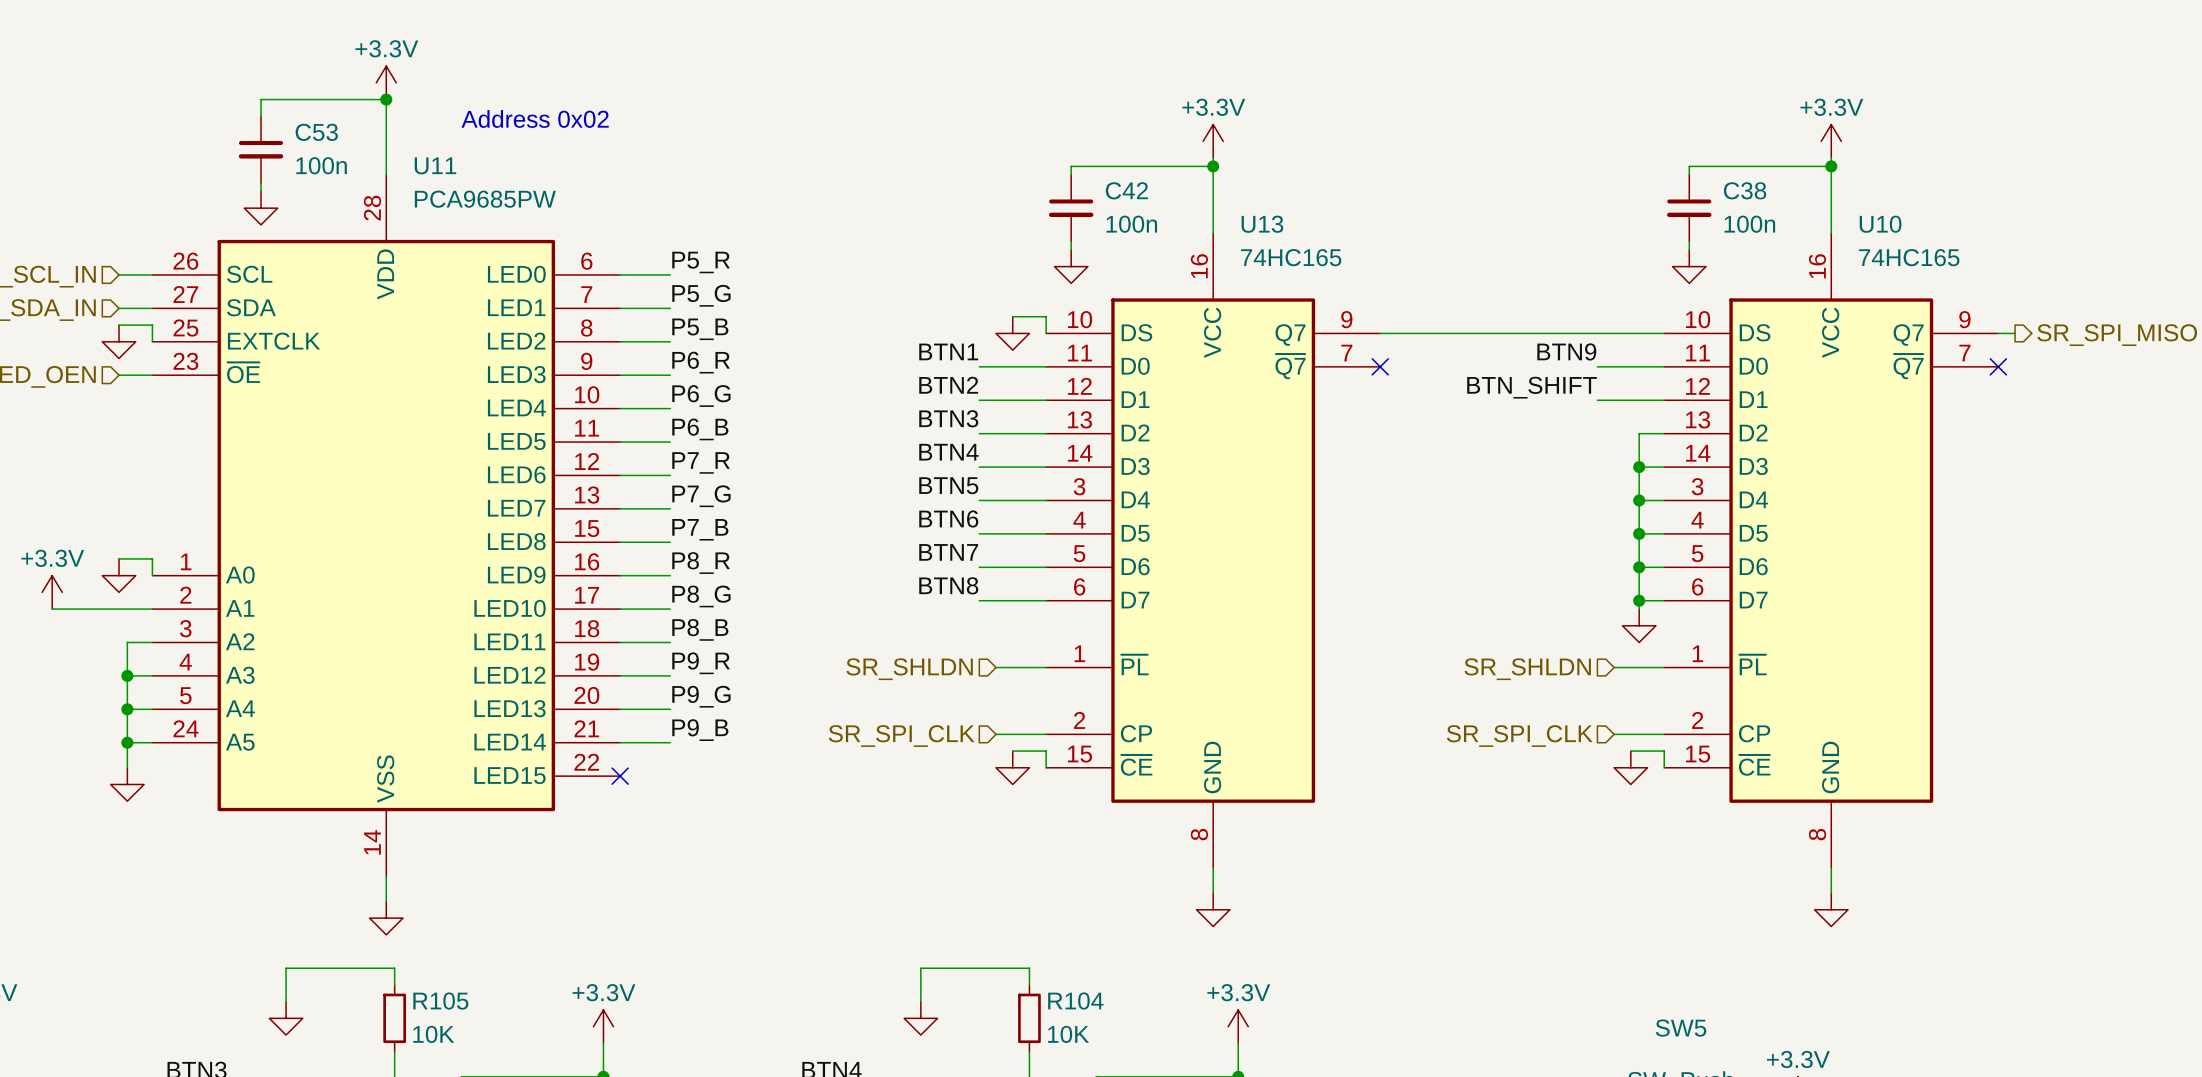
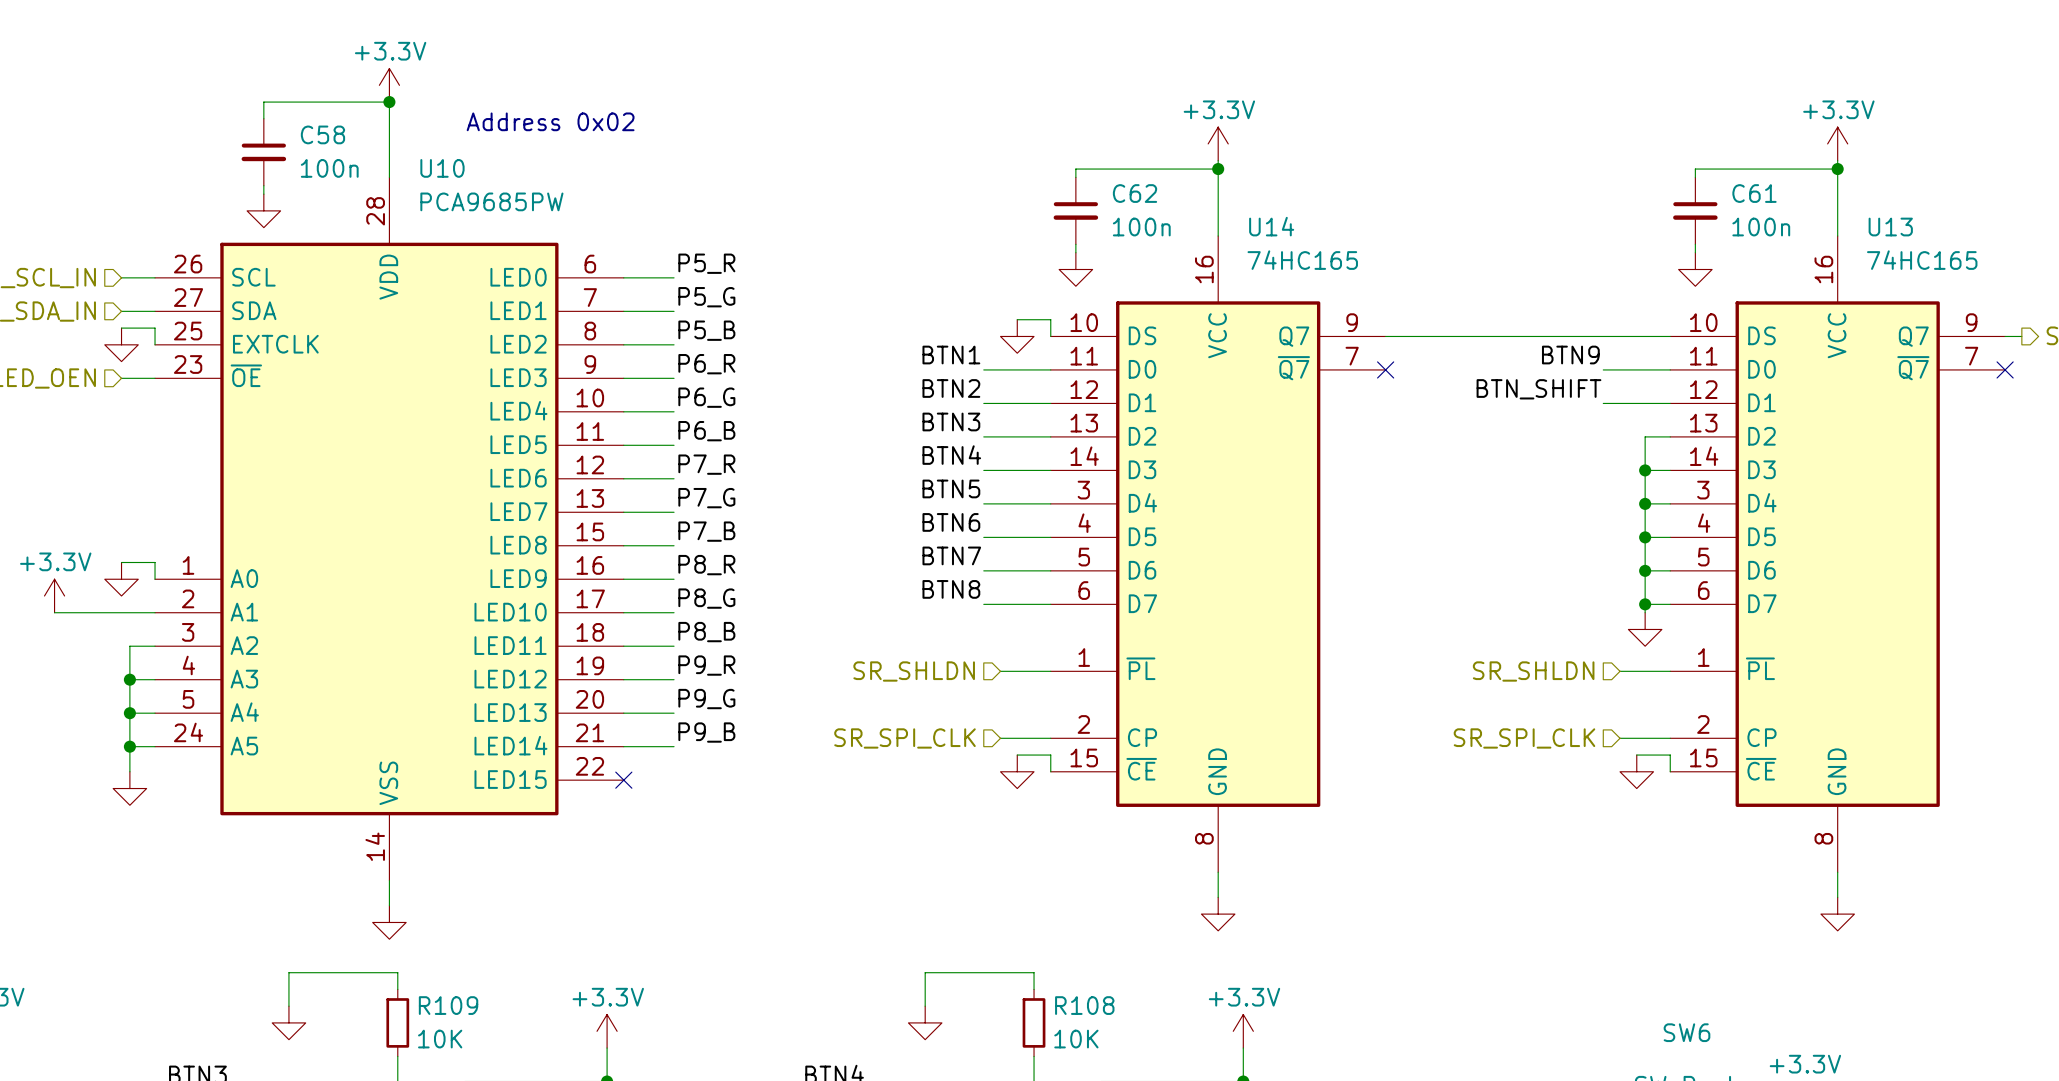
C53 name: C53 (316, 132) -> C58 (322, 134)
U11 name: U11 (435, 165) -> U10 (442, 168)
C42 name: C42 (1126, 190) -> C62 (1135, 193)
C38 name: C38 (1745, 190) -> C61 (1754, 193)
U13 name: U13 (1262, 224) -> U14 (1271, 226)
U10 name: U10 (1880, 224) -> U13 (1890, 227)
R105 name: R105 (440, 1001) -> R109 (448, 1005)
R104 name: R104 (1075, 1001) -> R108 (1084, 1005)
SW5 name: SW5 (1680, 1028) -> SW6 (1687, 1032)

